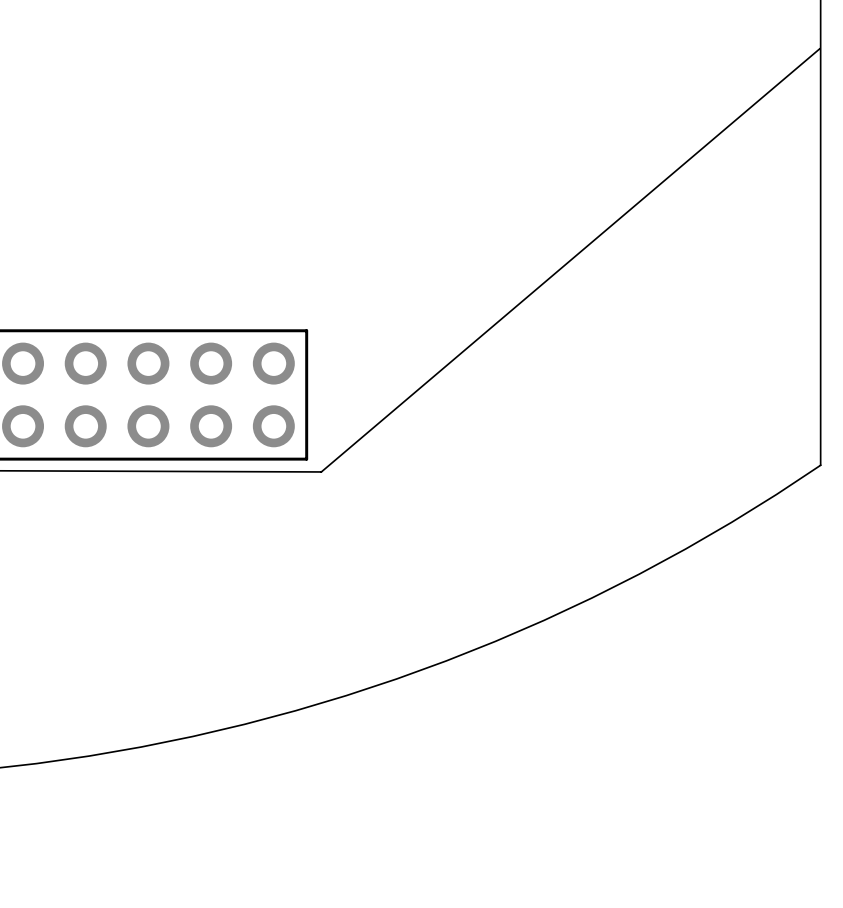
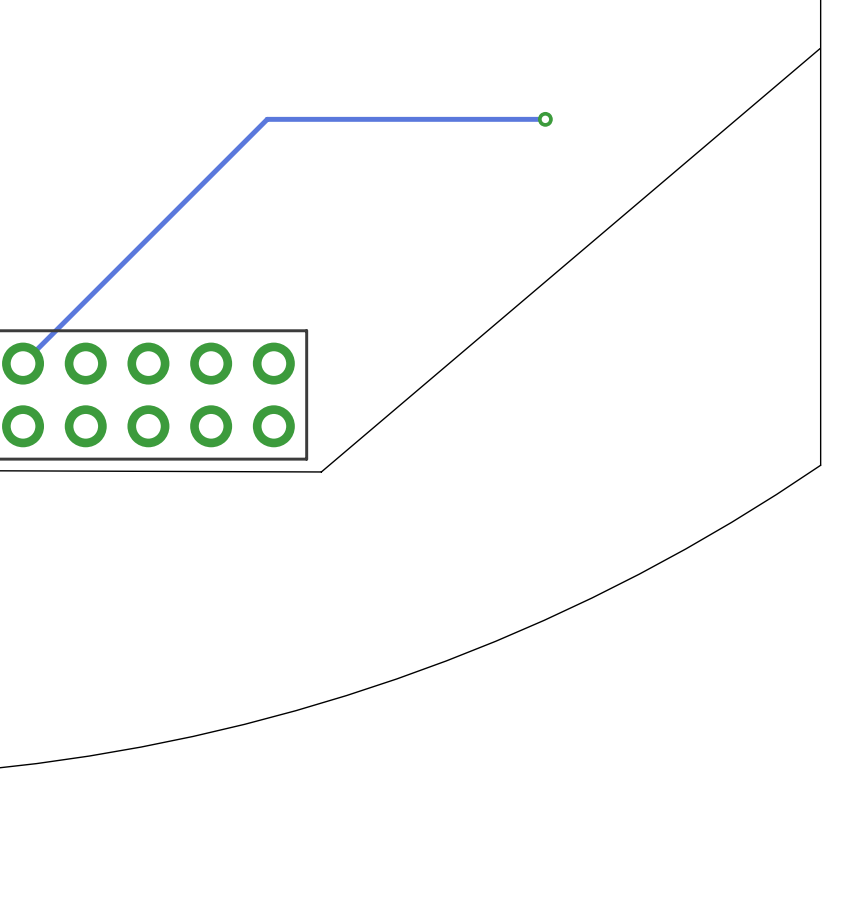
track: none -> (545, 119) (267, 119) (23, 363)
via: none -> (545, 119)

